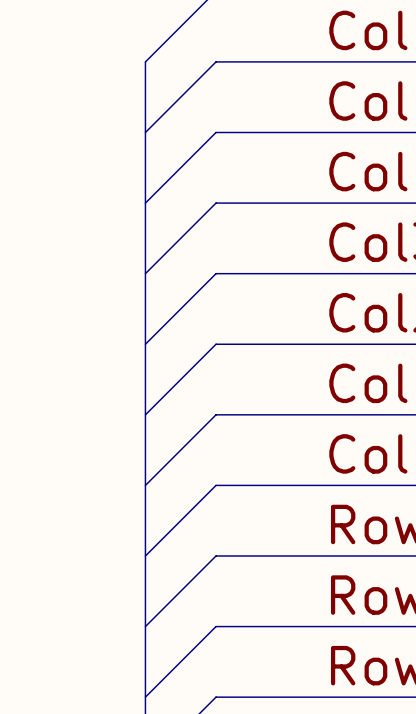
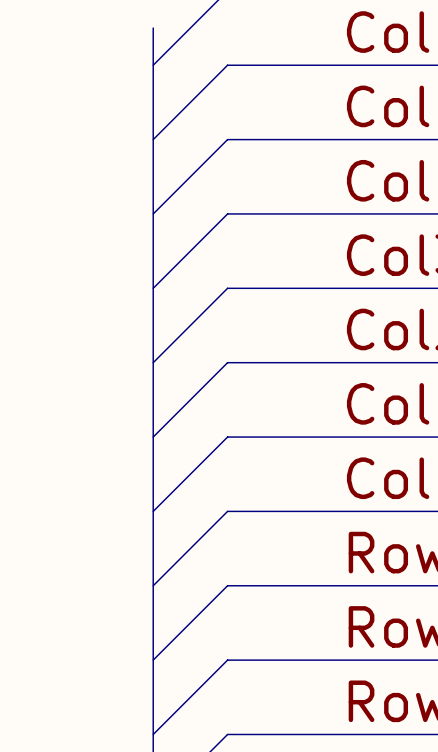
bus: none -> (153, 28) (153, 65)

